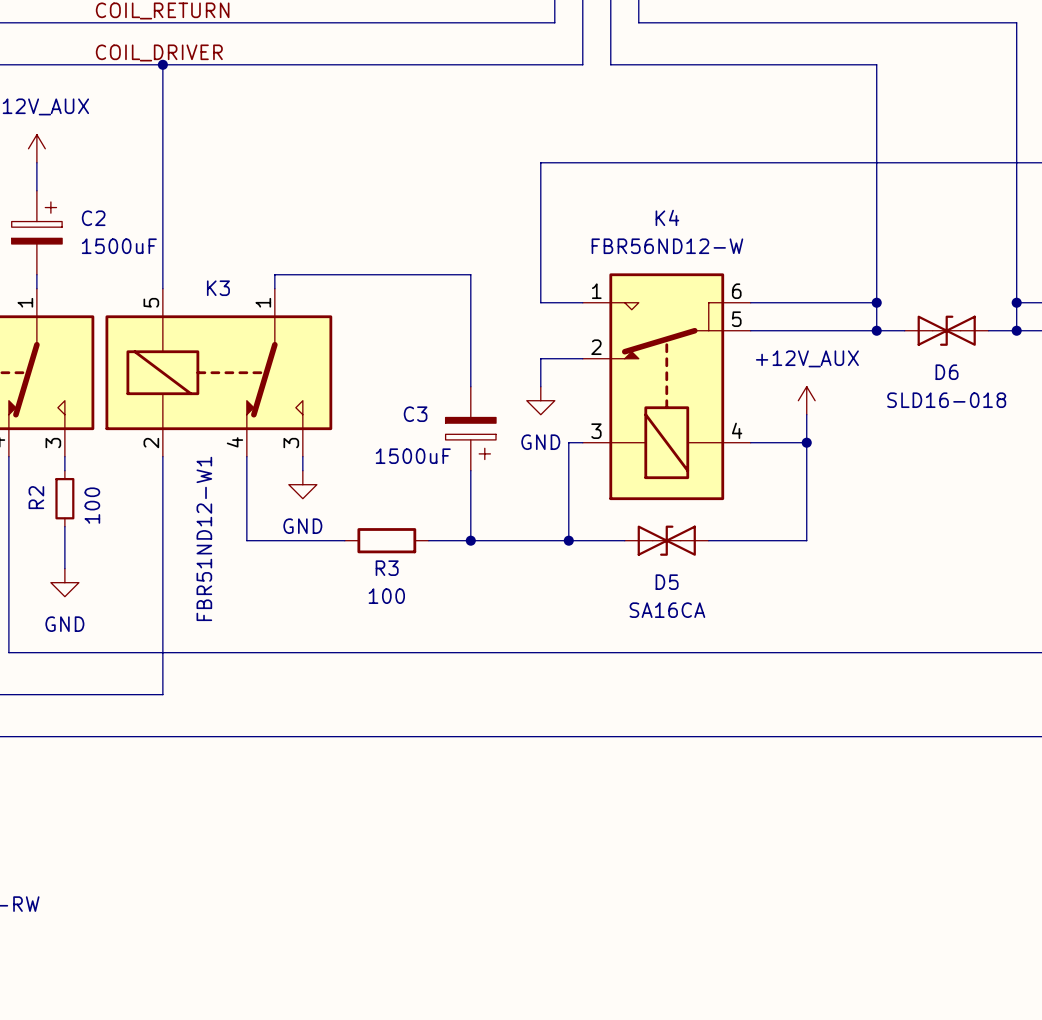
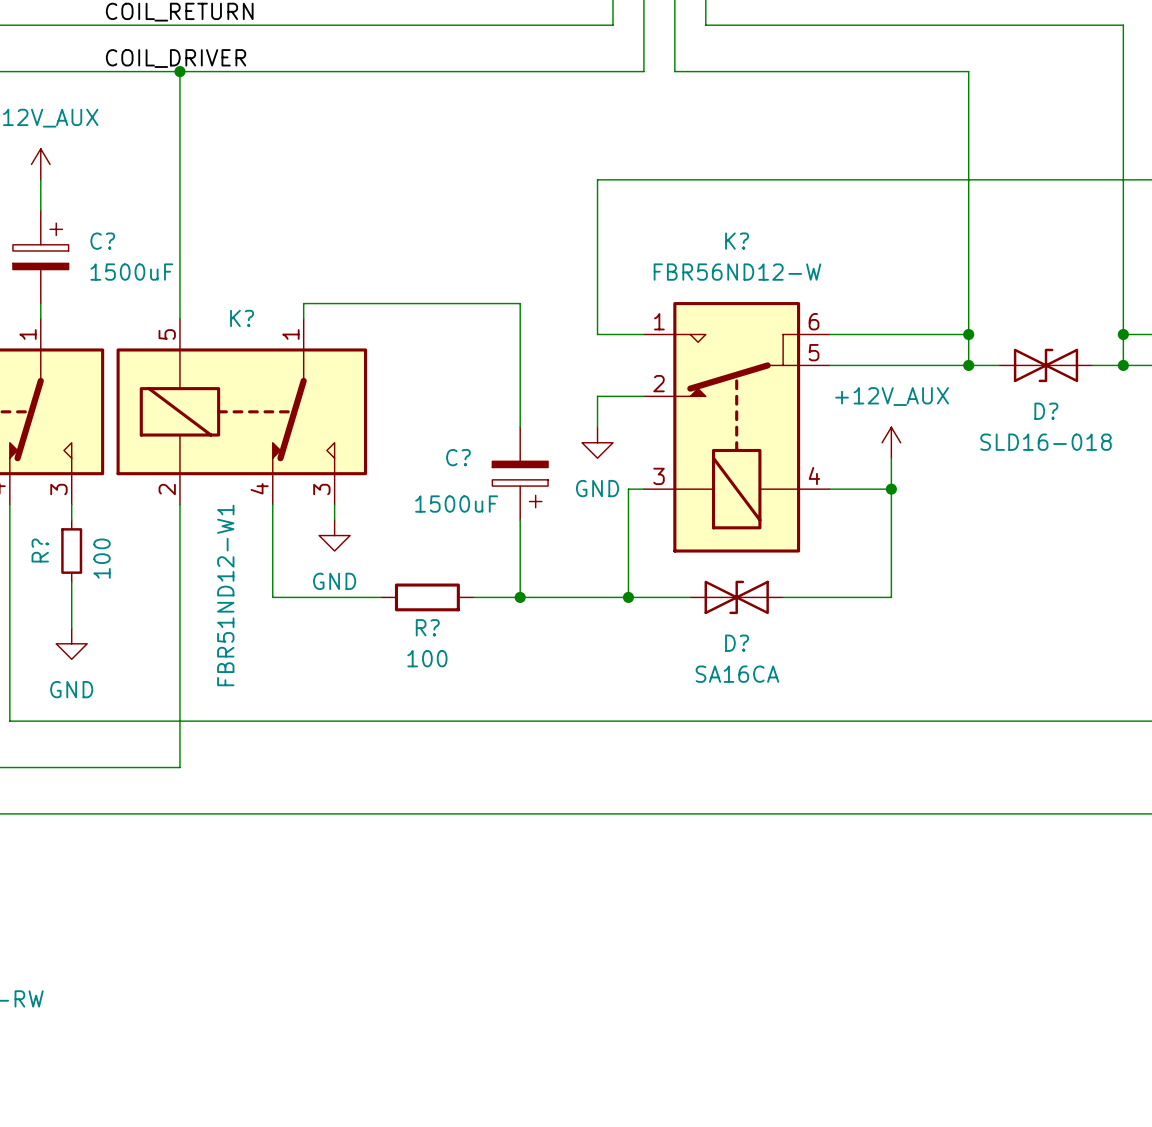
K4 name: K4 (667, 217) -> K? (737, 241)
C2 name: C2 (93, 218) -> C? (102, 241)
K3 name: K3 (218, 288) -> K? (242, 318)
D6 name: D6 (947, 372) -> D? (1046, 411)
C3 name: C3 (415, 414) -> C? (458, 457)
R2 name: R2 (36, 497) -> R? (40, 550)
R3 name: R3 (387, 568) -> R? (427, 627)
D5 name: D5 (667, 582) -> D? (737, 643)

